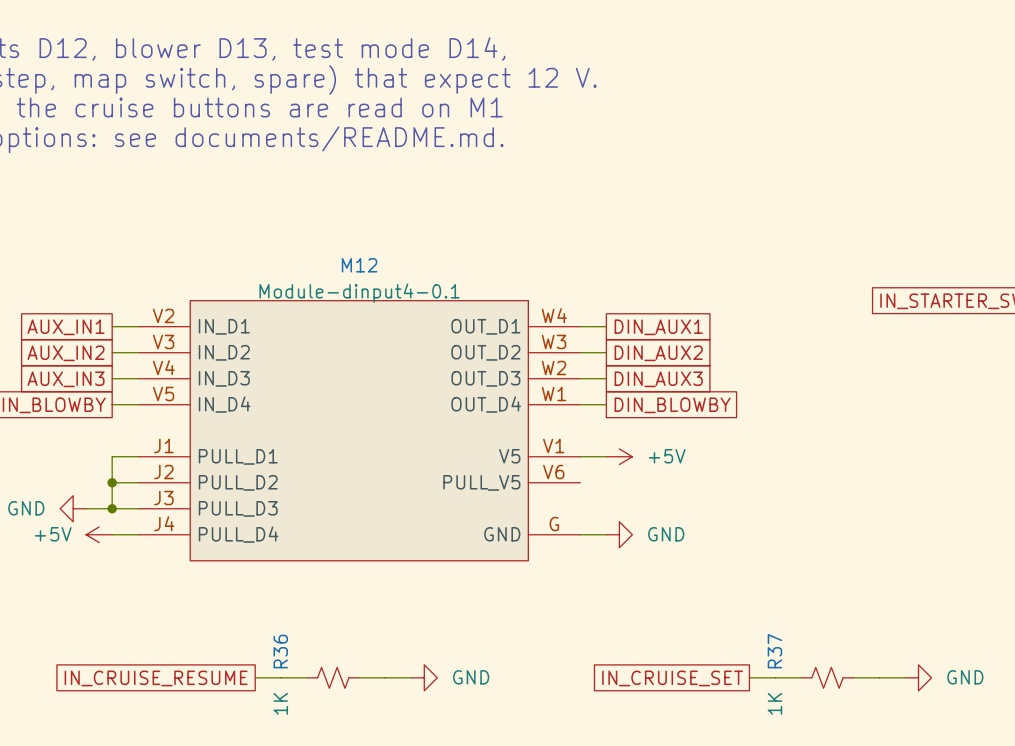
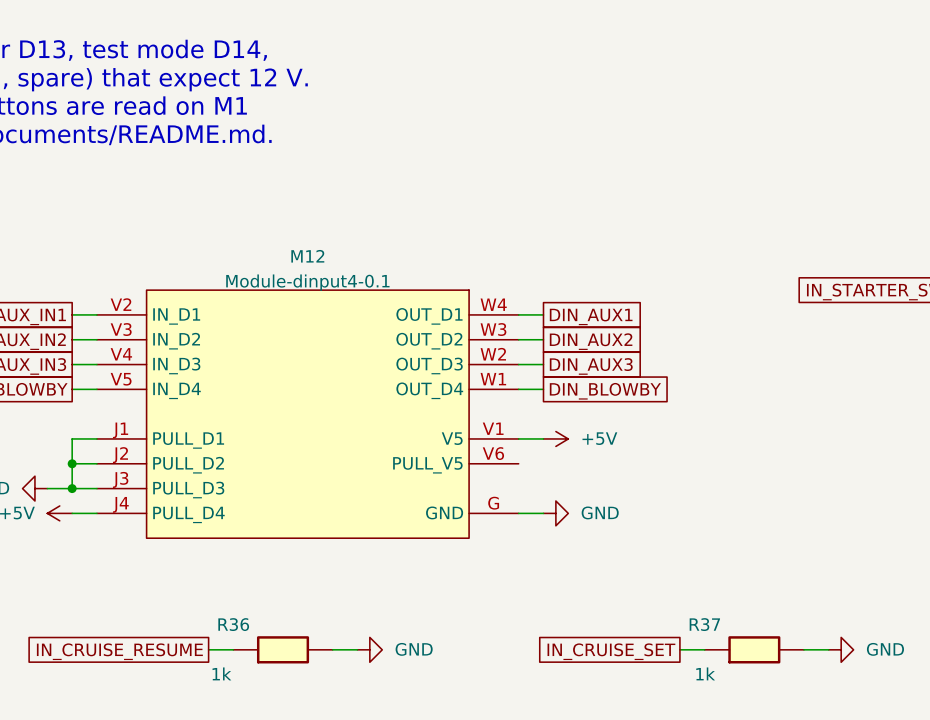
R36 symbol: [307, 667, 360, 689] -> [233, 636, 333, 664]
R37 symbol: [801, 667, 854, 689] -> [704, 636, 804, 664]
R36 value: 1K (280, 703) -> 1k (221, 673)
R37 value: 1K (774, 703) -> 1k (705, 673)

